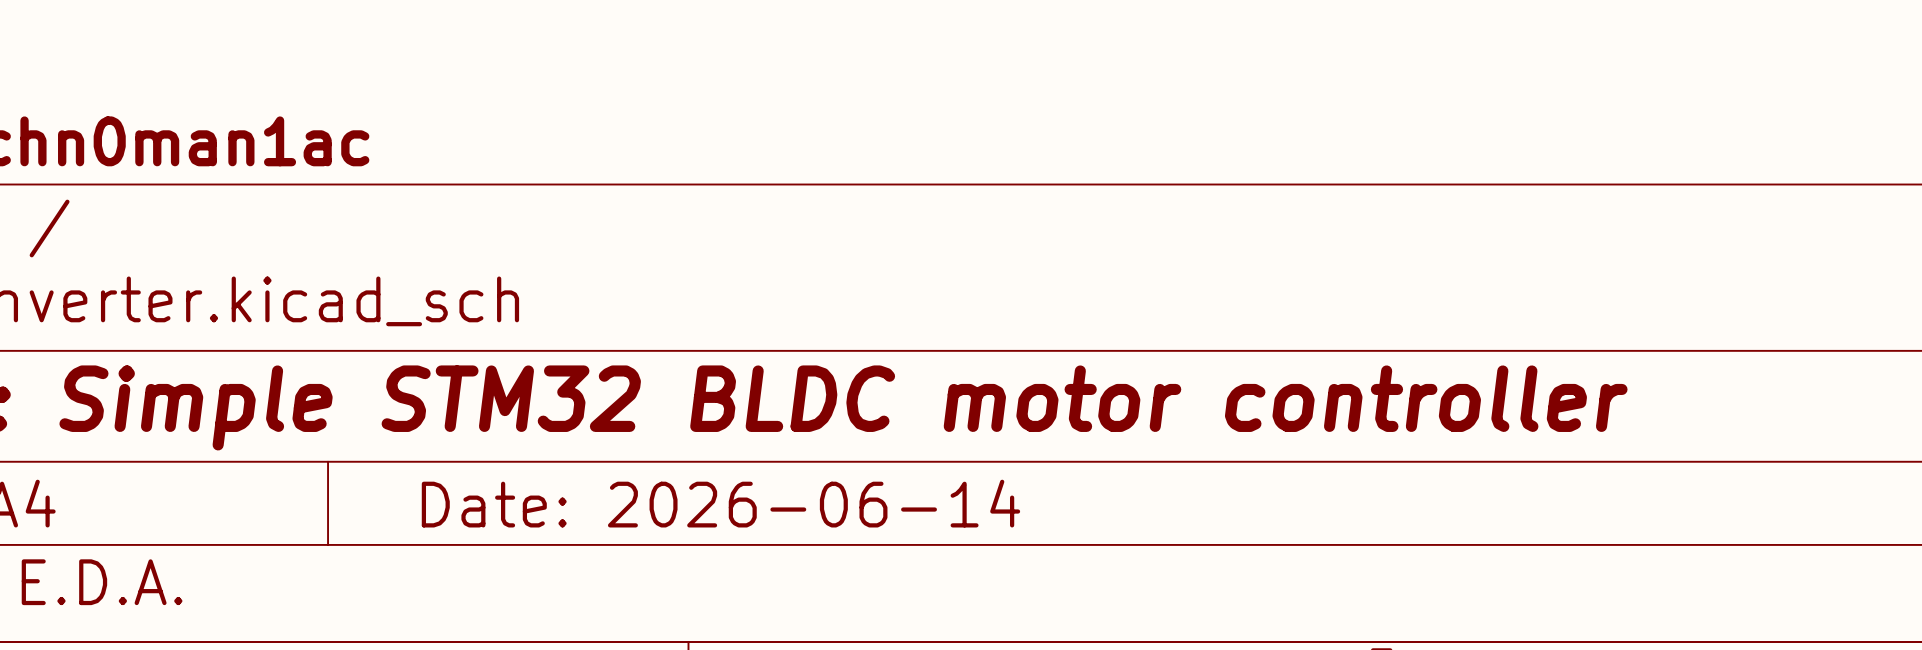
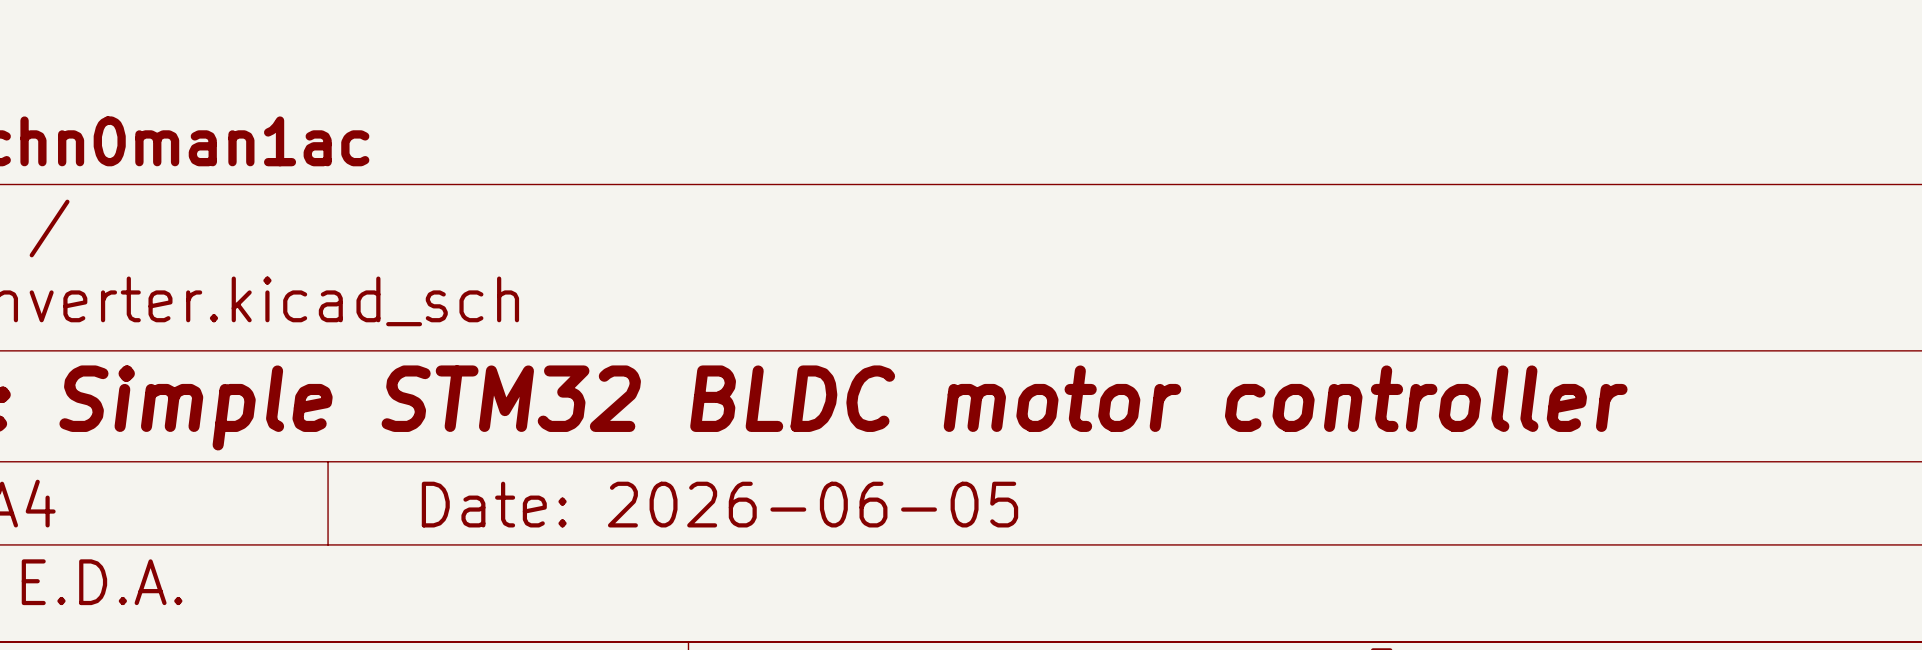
title block: Date: 2026-06-14 (720, 503) -> Date: 2026-06-05 (719, 504)

